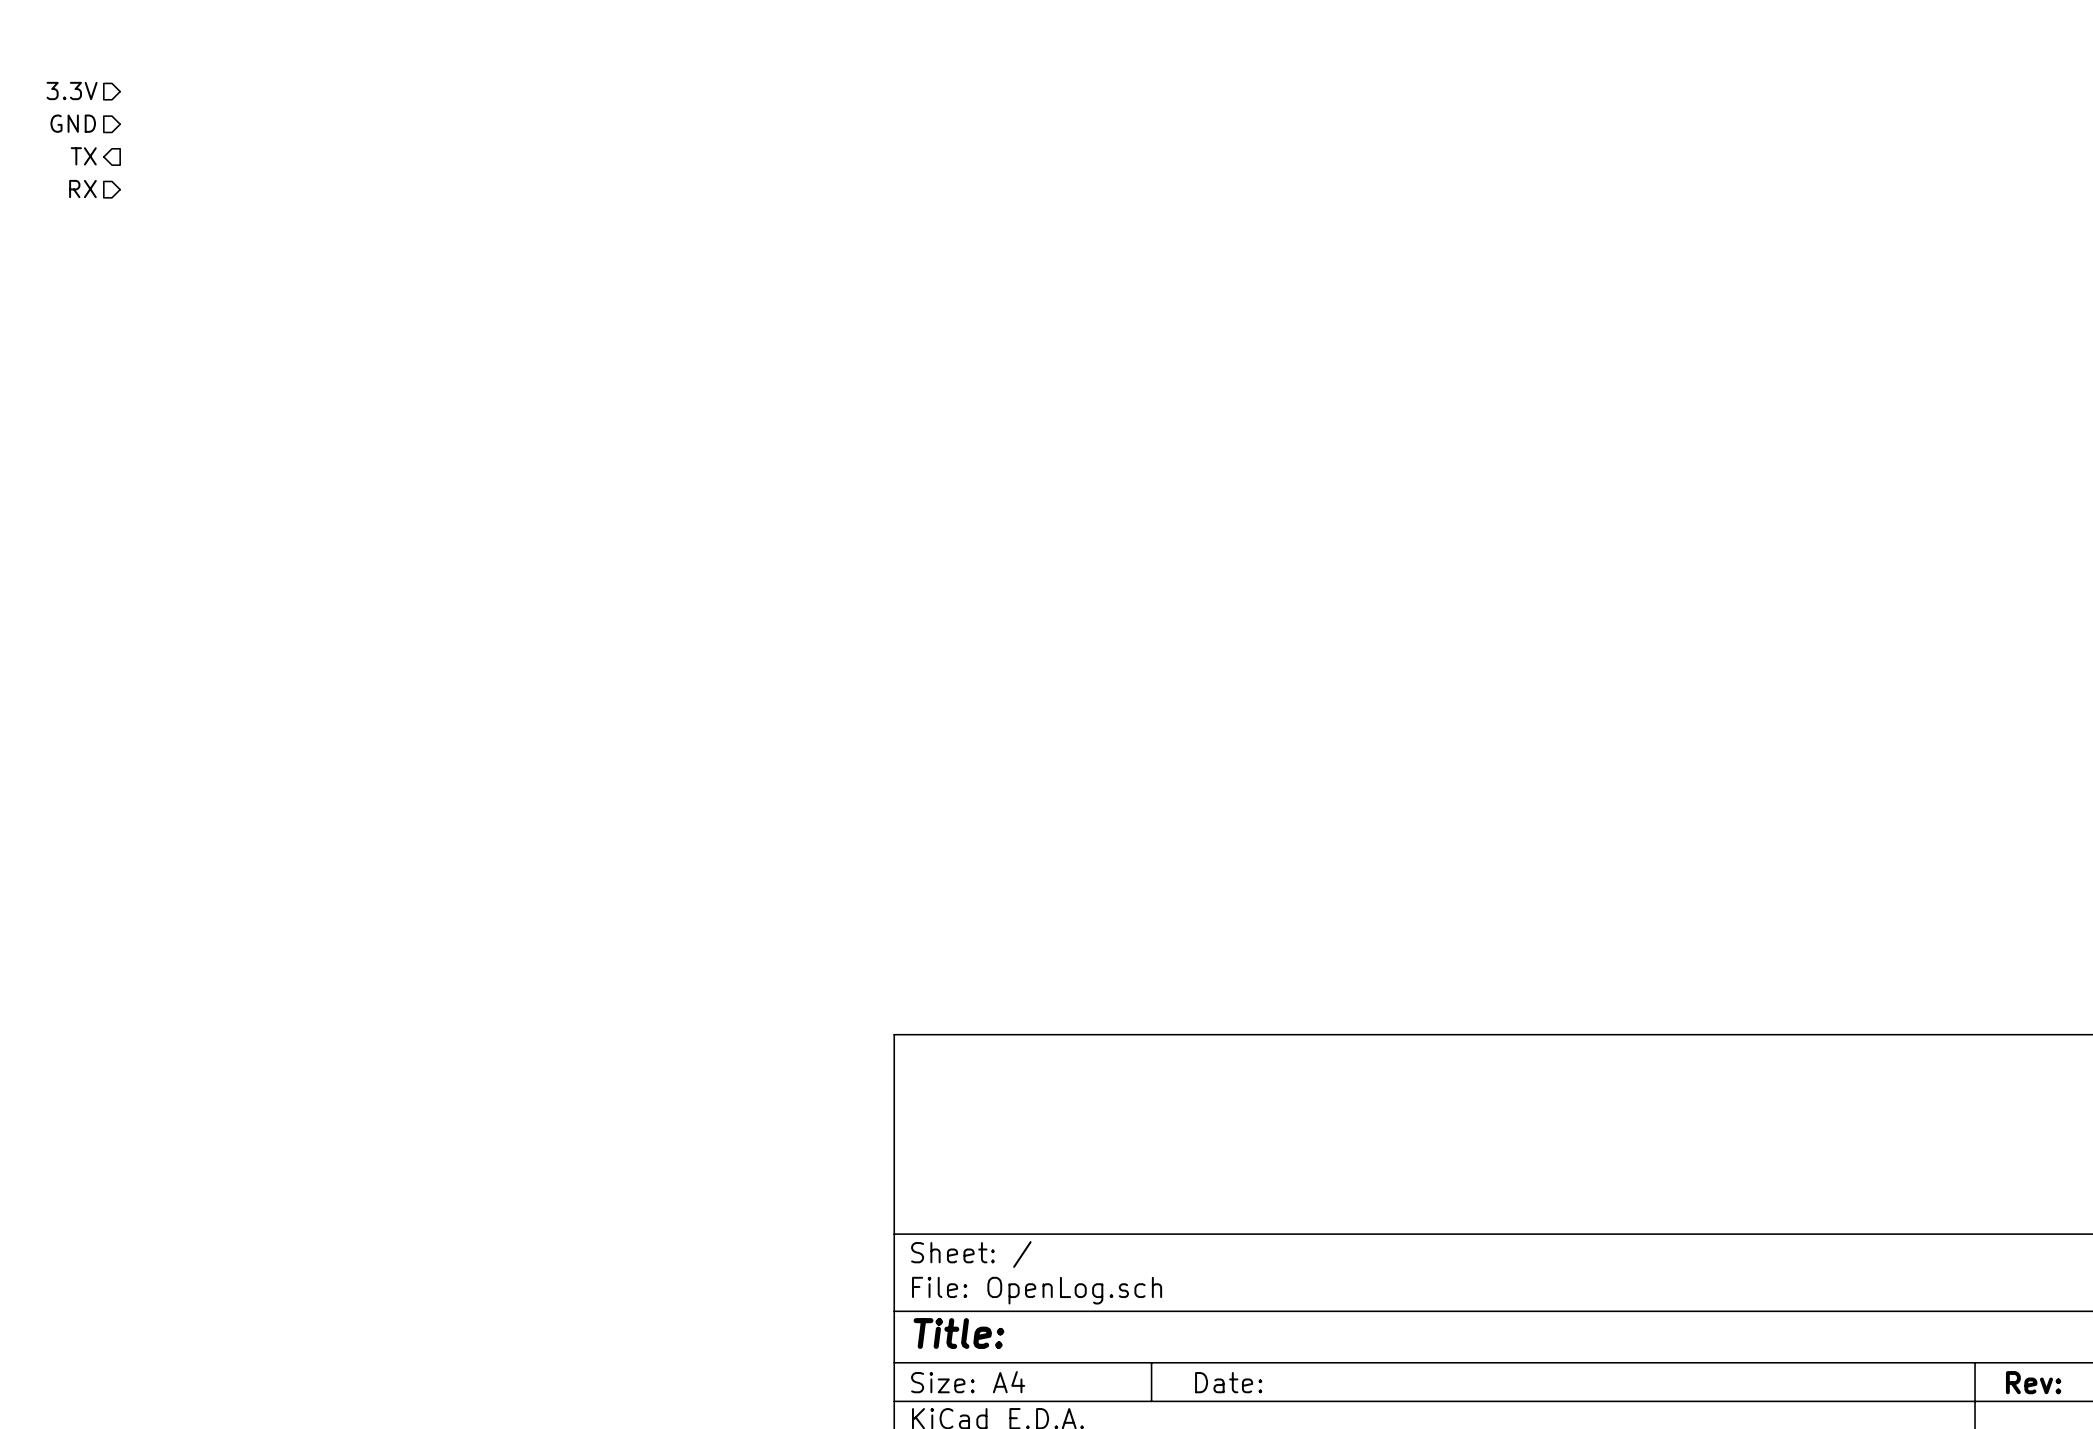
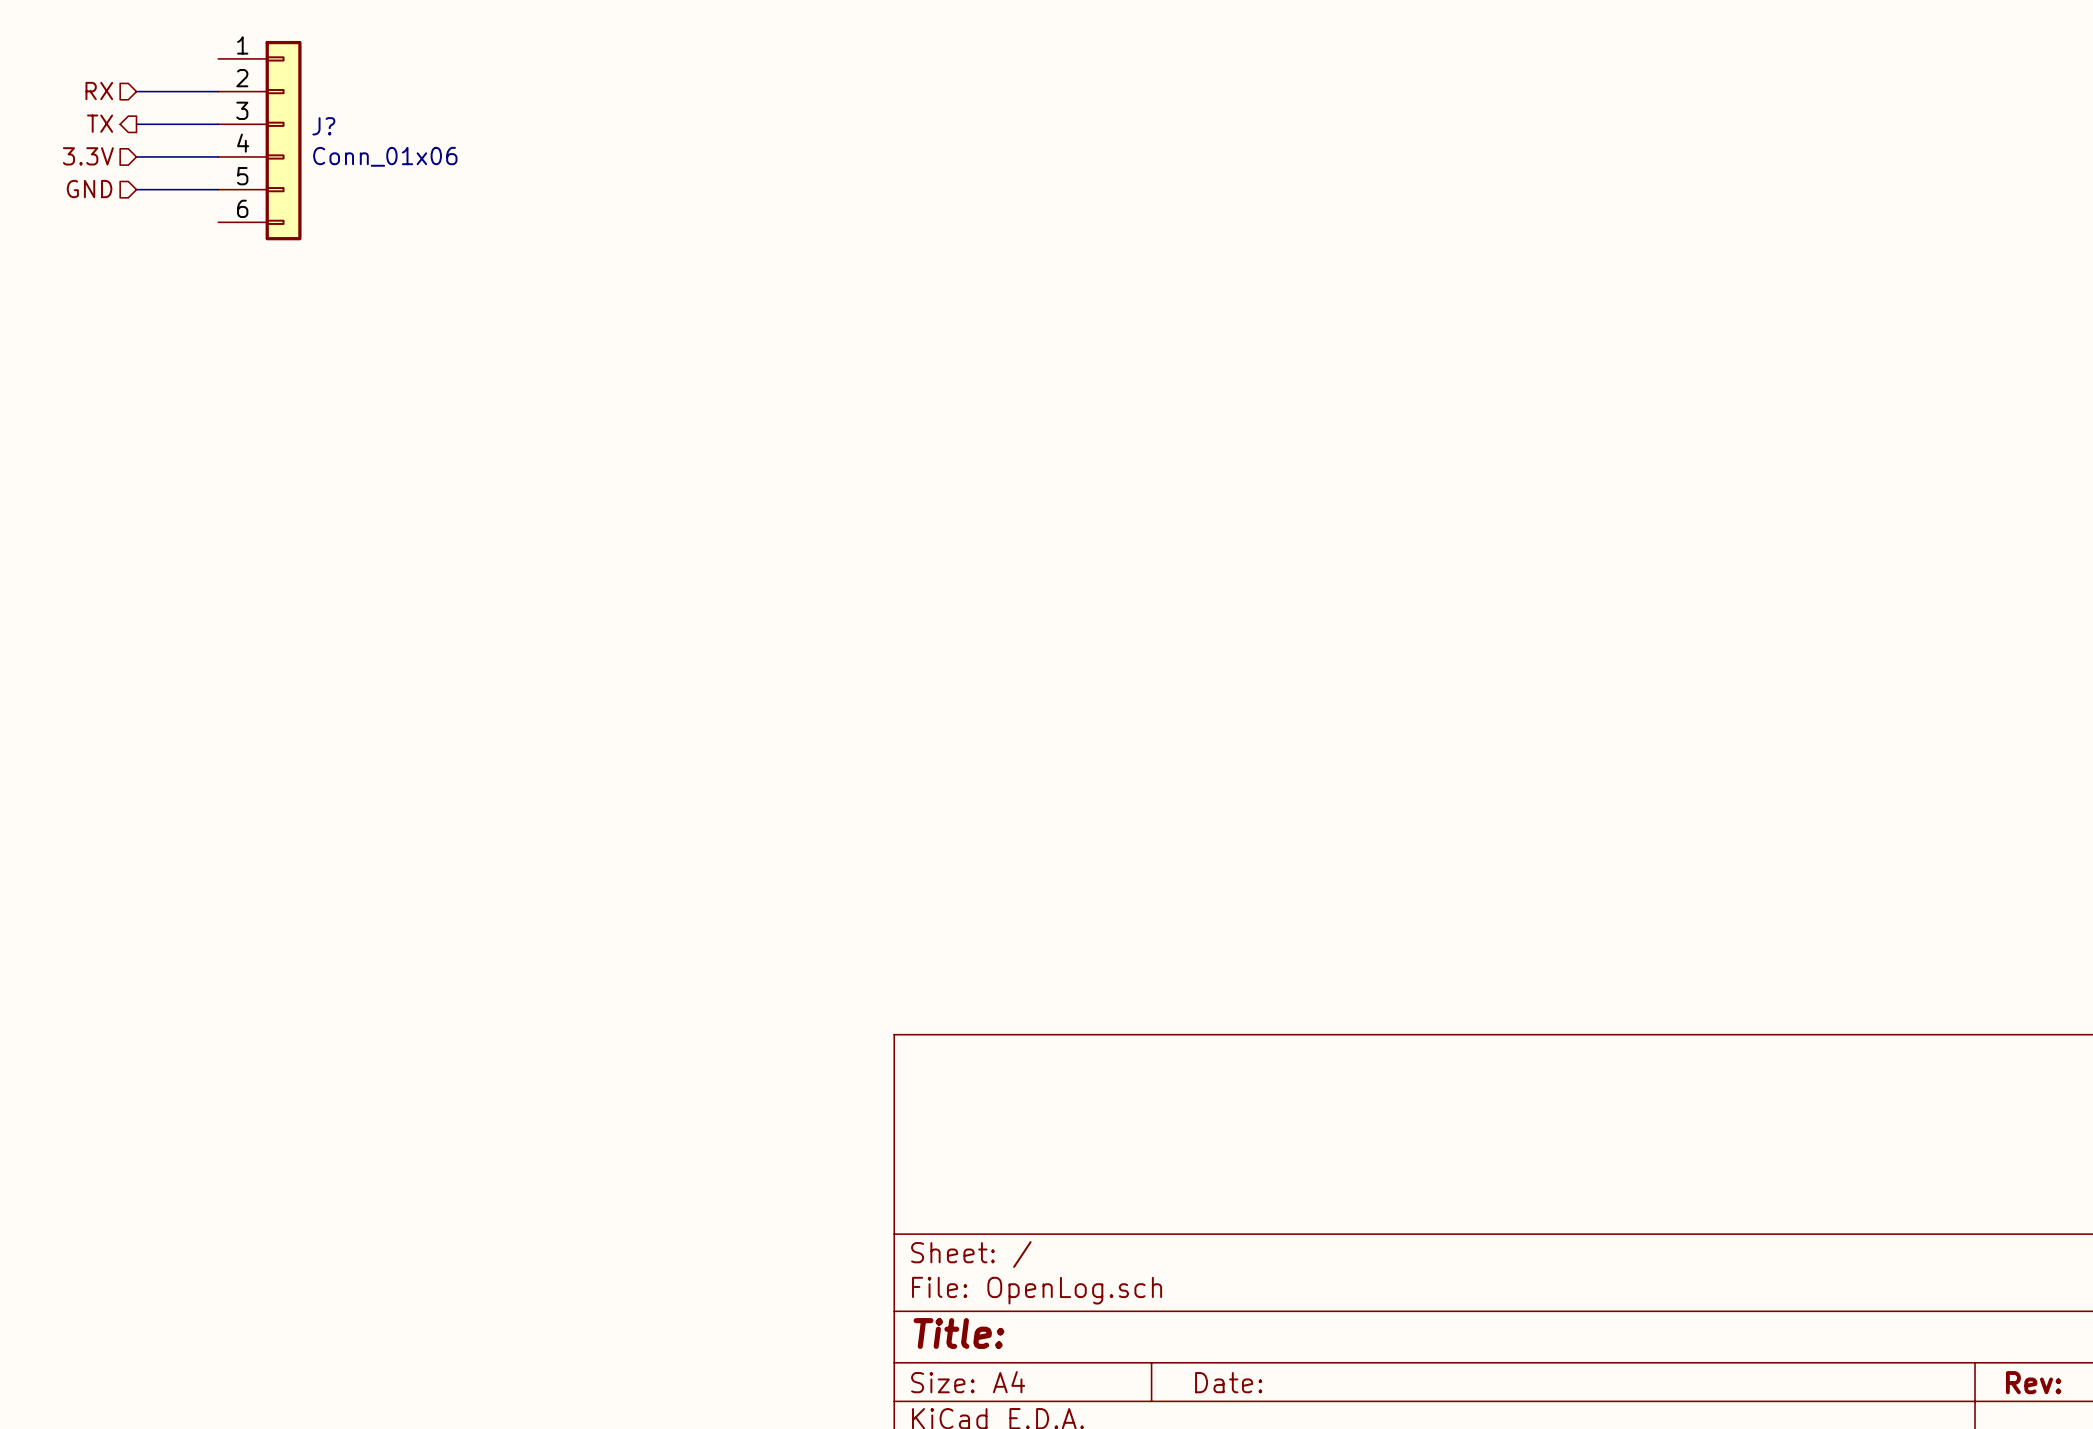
hierarchical label position: 3.3V (72, 91) -> 3.3V (88, 156)
wire: none -> (136, 91) (218, 91)
hierarchical label position: GND (73, 123) -> GND (89, 189)
wire: none -> (136, 124) (218, 124)
J?: none -> Conn_01x06 (259, 140)
hierarchical label position: TX (83, 156) -> TX (100, 123)
wire: none -> (136, 156) (218, 156)
hierarchical label position: RX (82, 189) -> RX (99, 91)
wire: none -> (136, 189) (218, 189)

